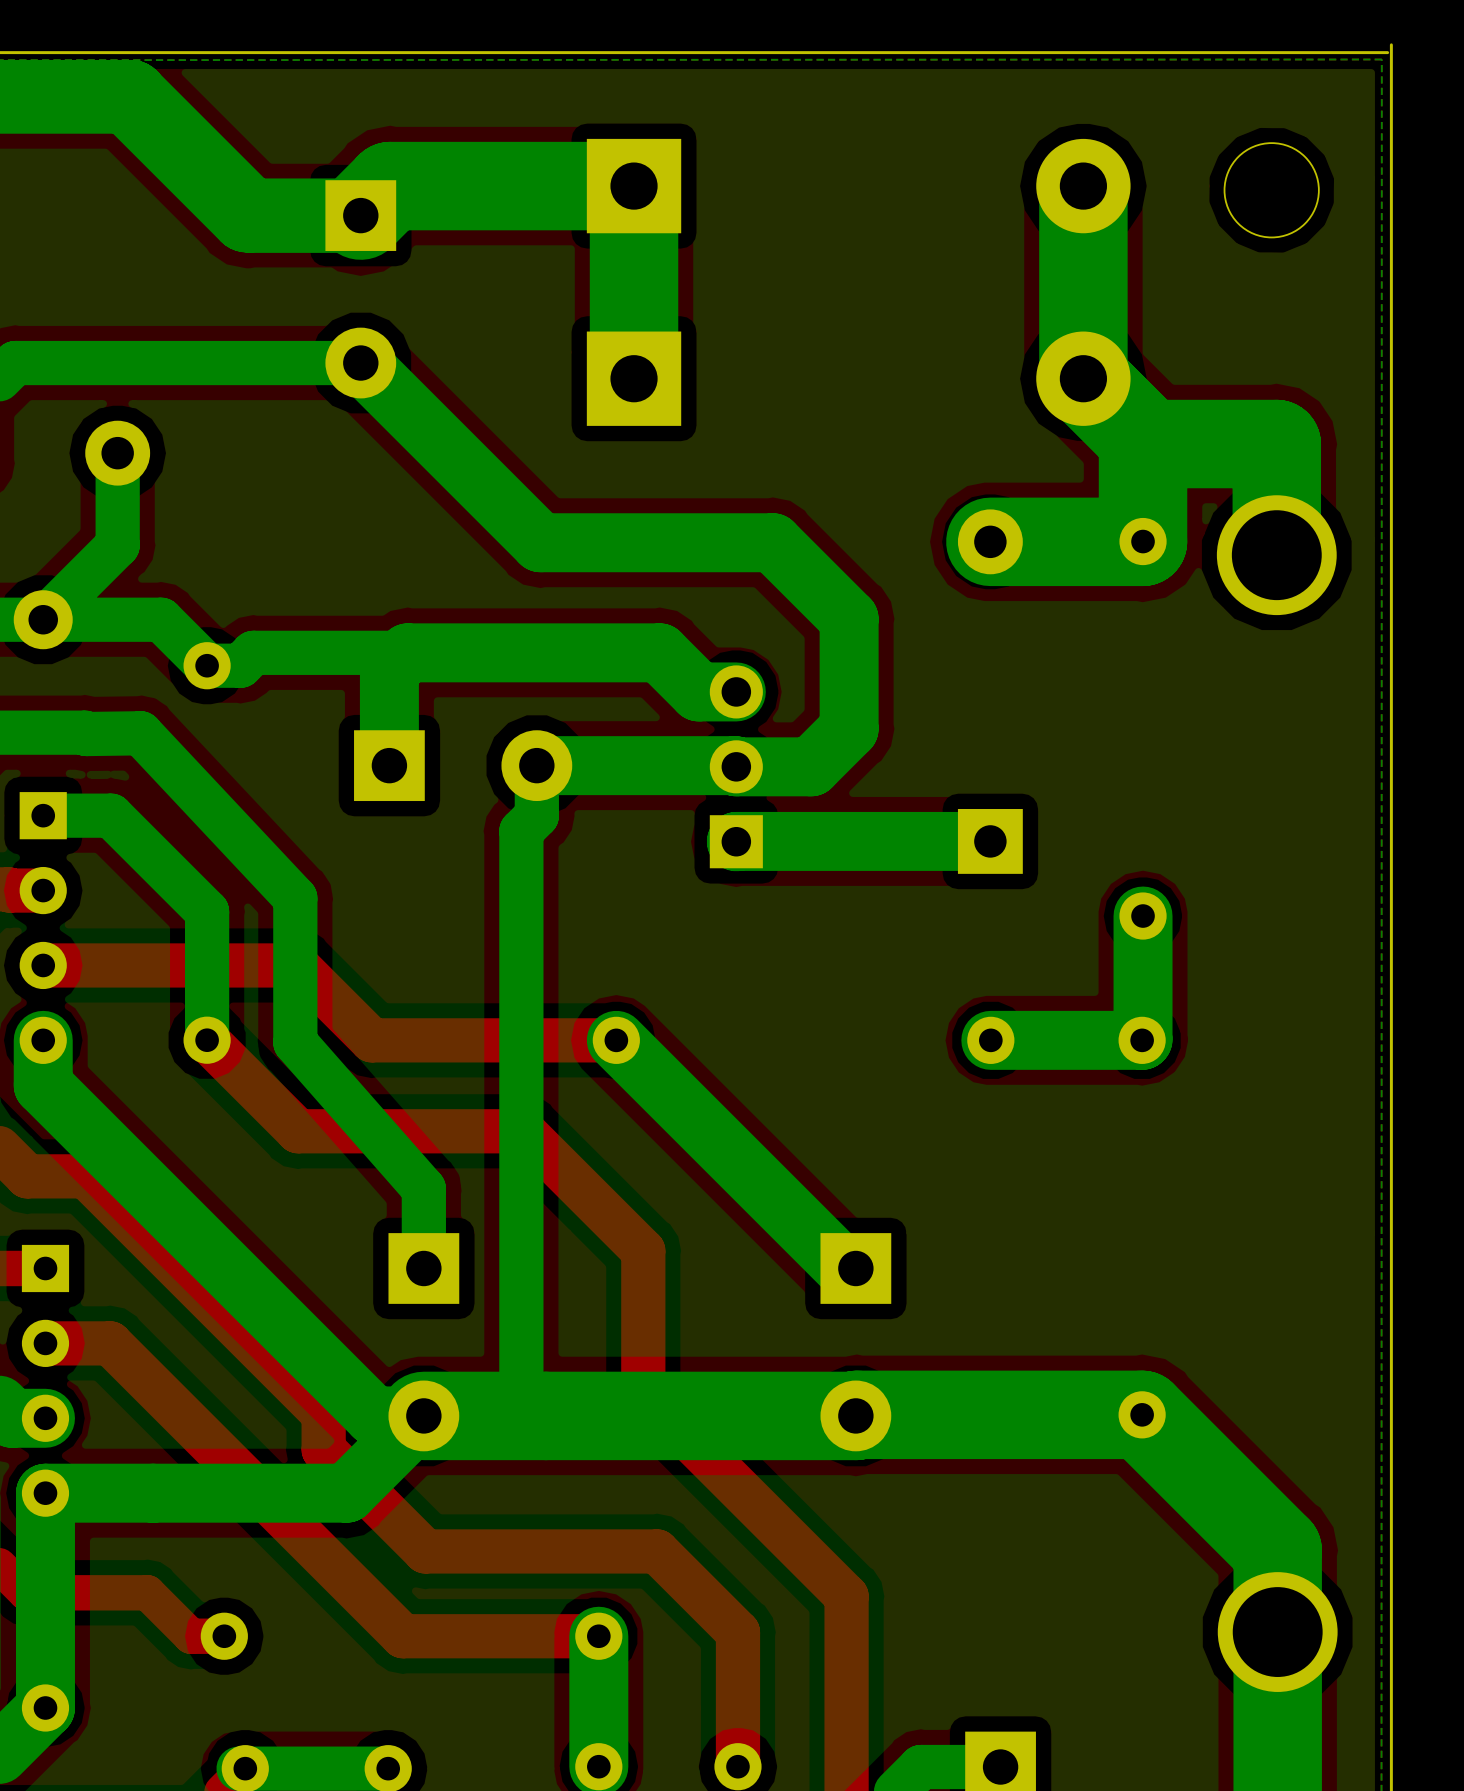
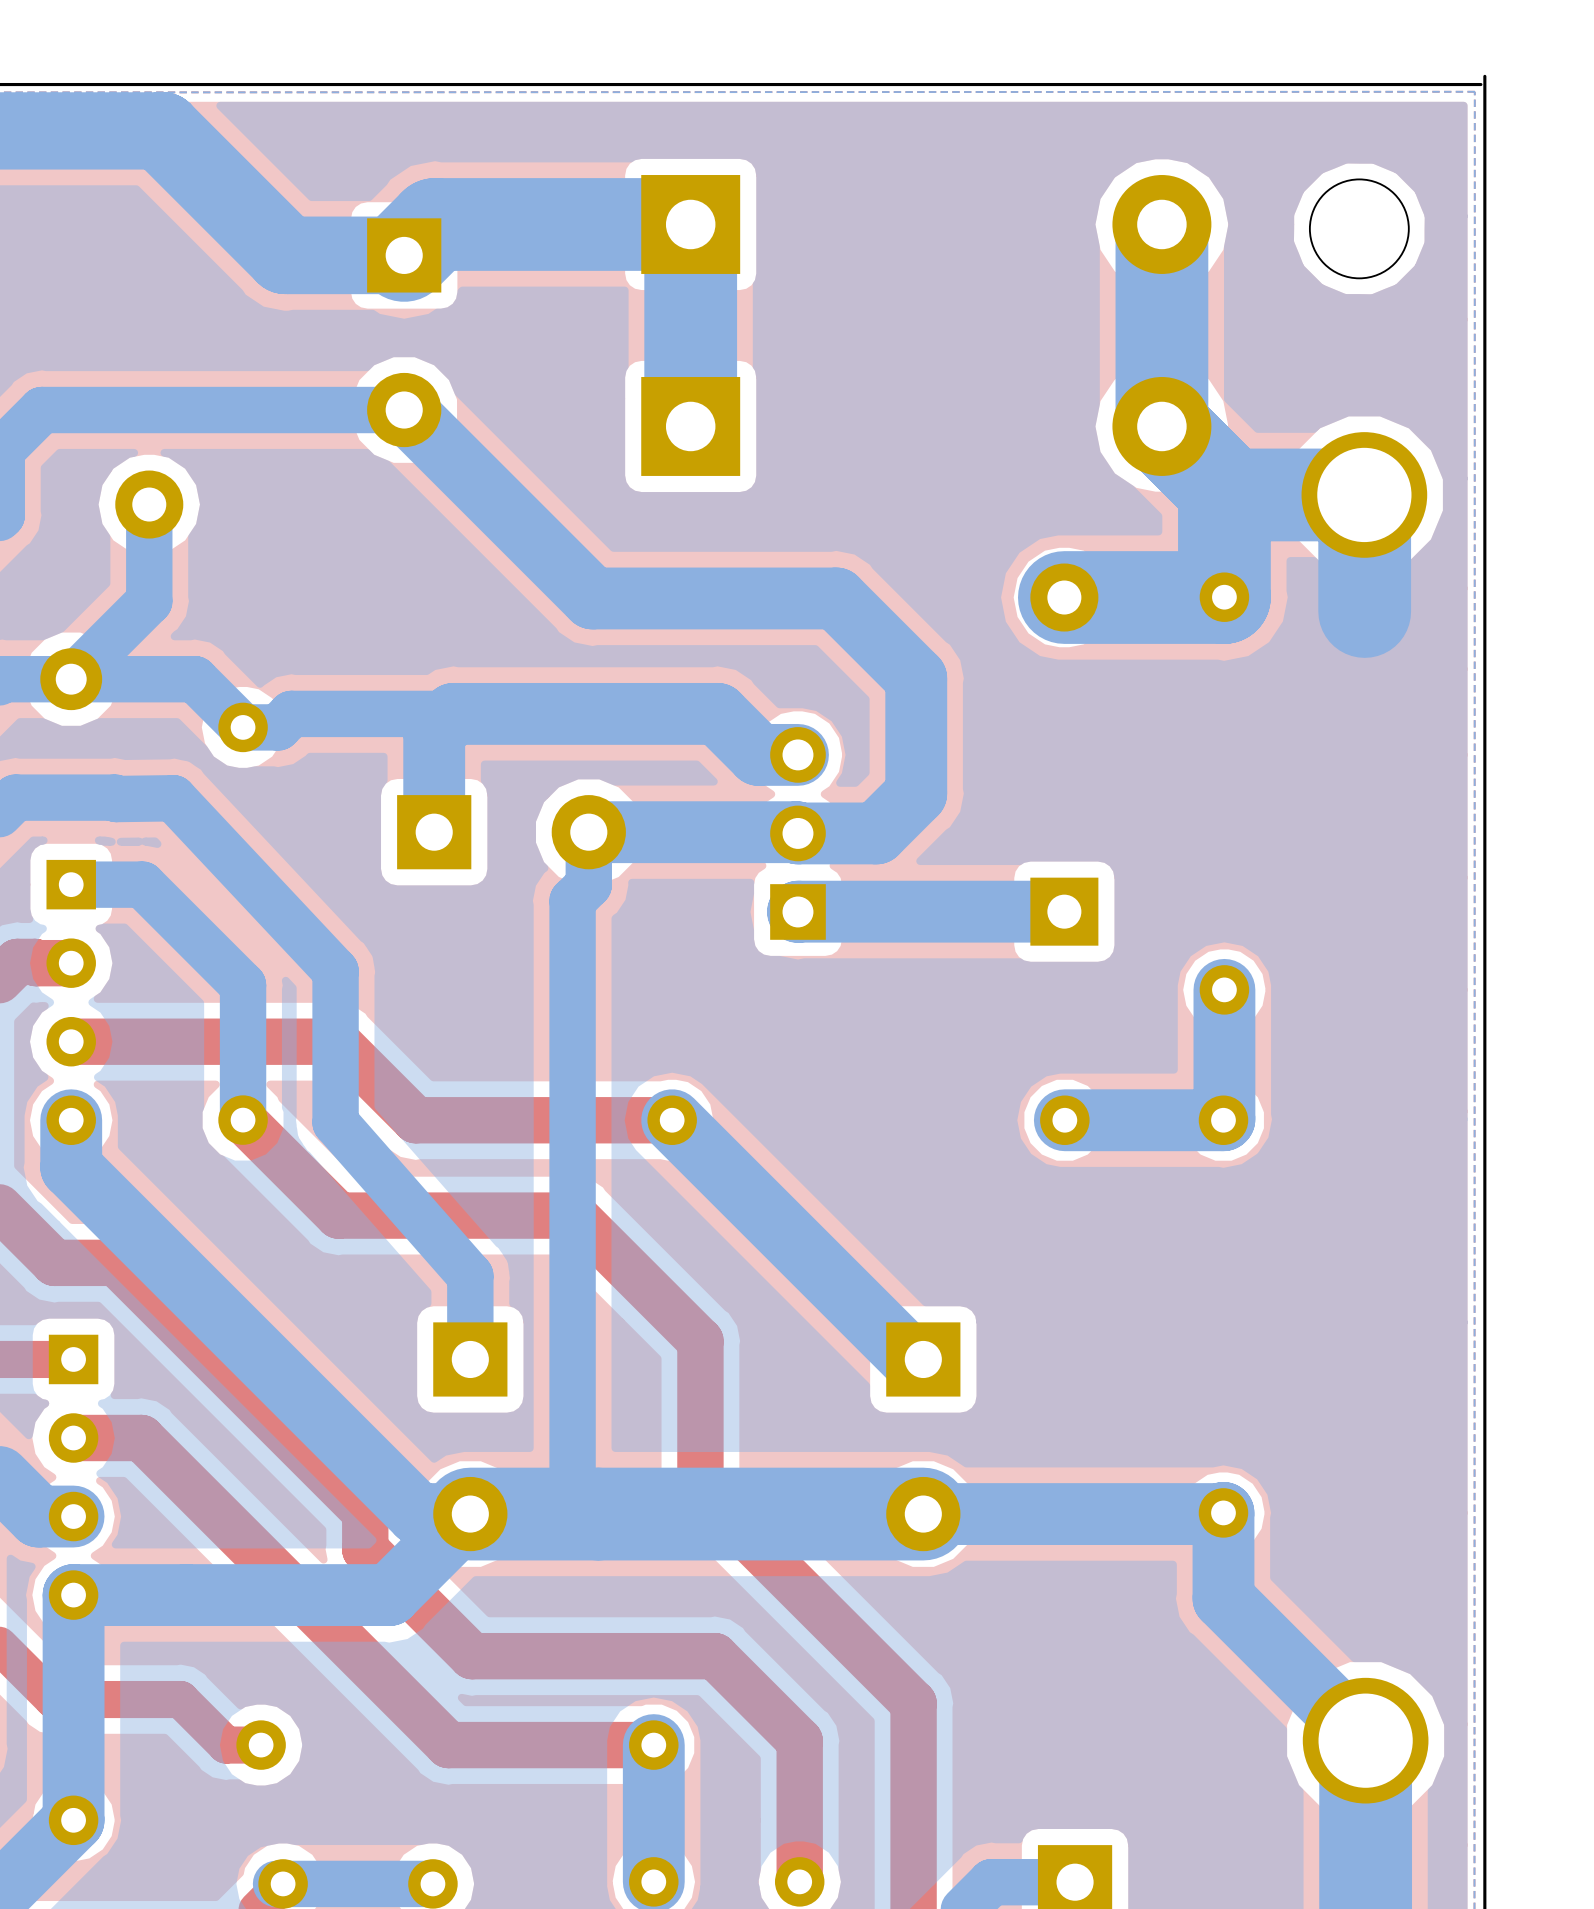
part position: (1276, 555) -> (1364, 494)
bottom track: (855, 1415) (1142, 1414) (1277, 1550) (1277, 1632) -> (923, 1514) (1223, 1512) (1223, 1598) (1365, 1740)

